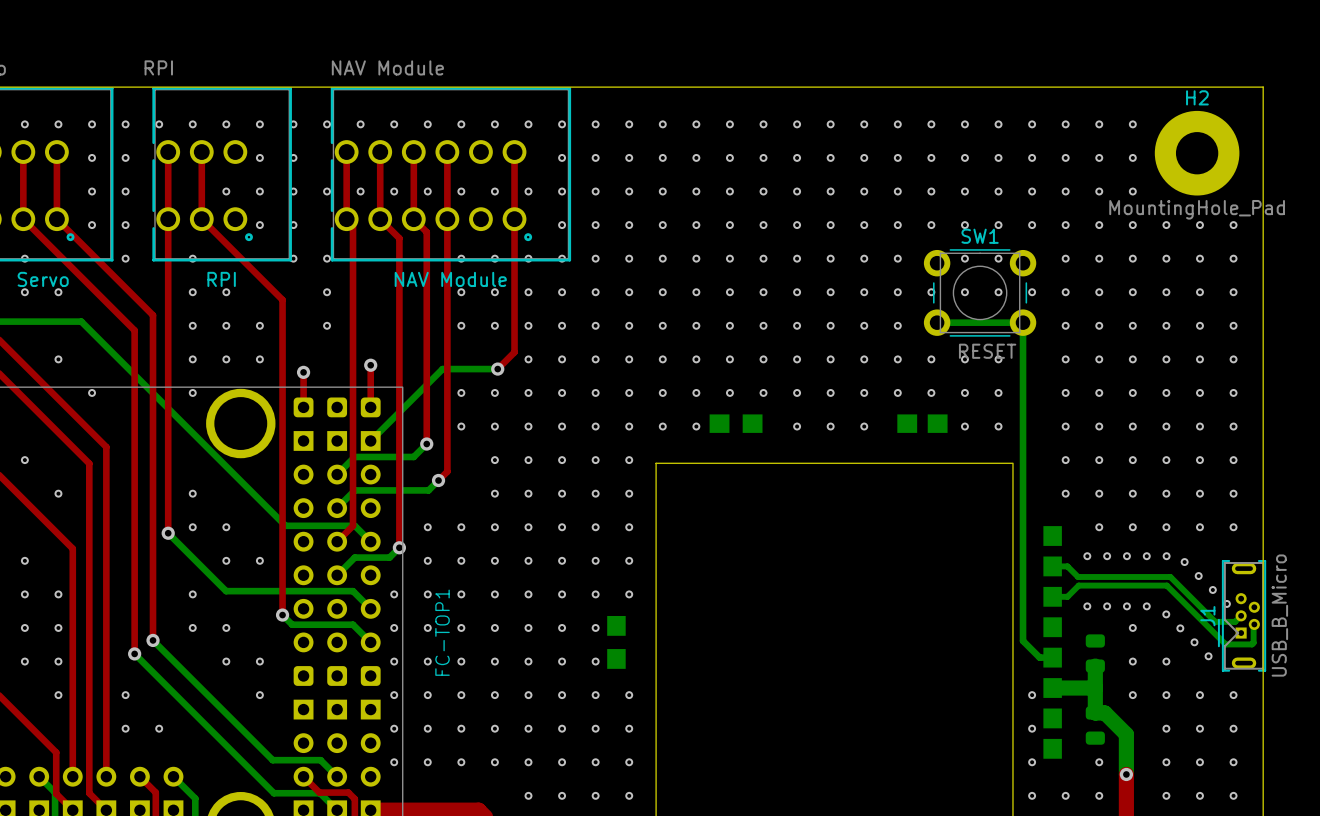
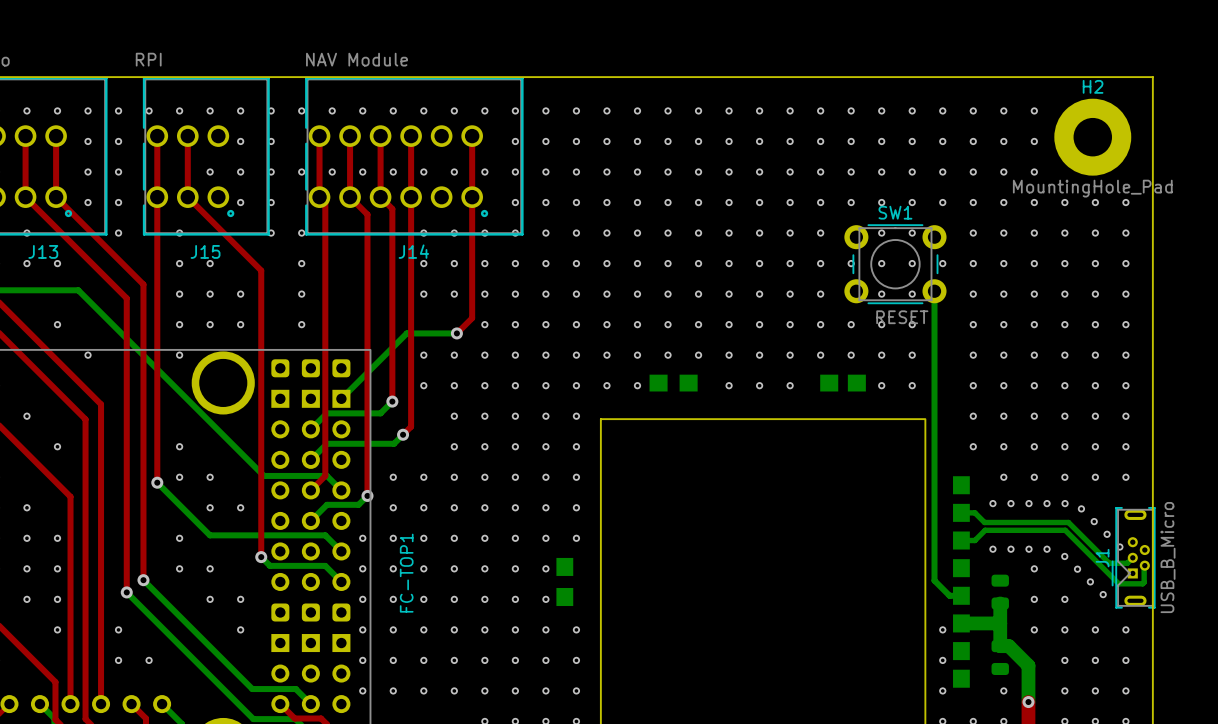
Servo name: Servo (43, 279) -> J13 (43, 251)
RPI name: RPI (221, 279) -> J15 (205, 251)
NAV Module name: NAV Module (450, 279) -> J14 (413, 251)
bottom track: (937, 322) (1023, 322) -> none
via: none -> (881, 294)
via: none -> (912, 294)
via: none -> (301, 324)
top track: (370, 365) (370, 407) -> none
via: (370, 365) -> none
top track: (303, 372) (303, 407) -> none
via: (303, 372) -> none

